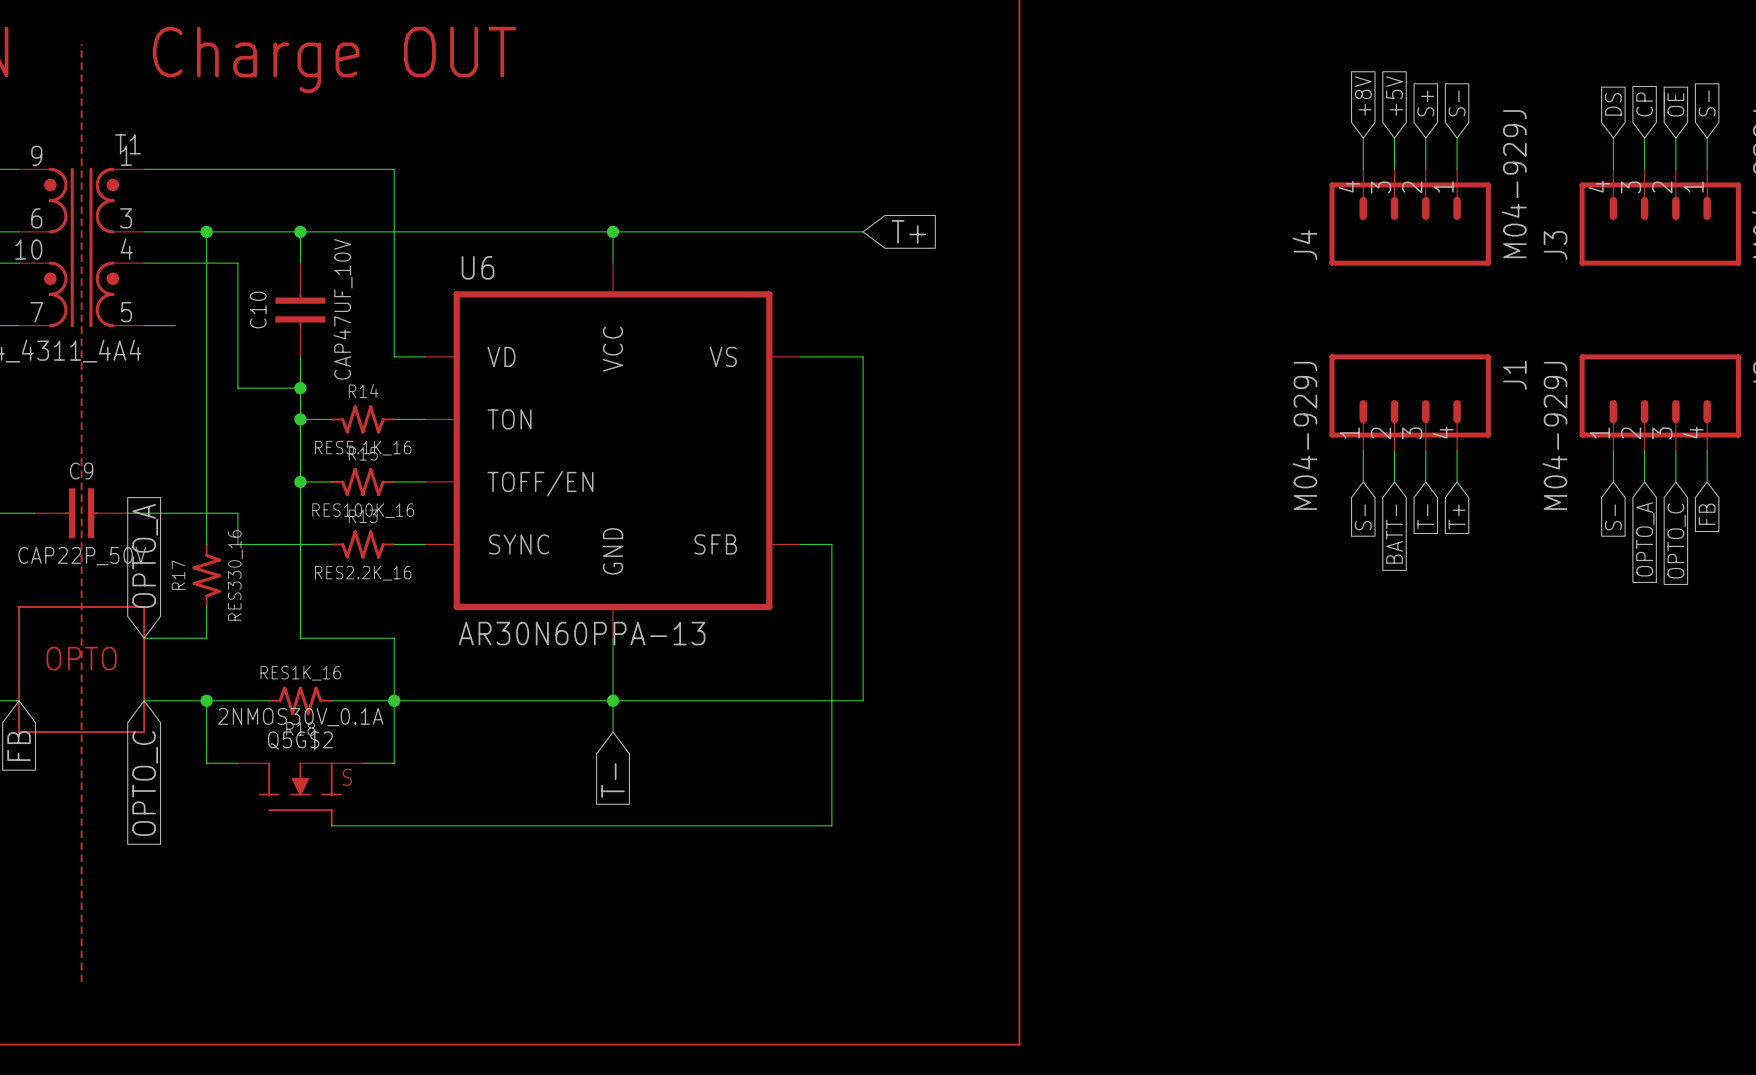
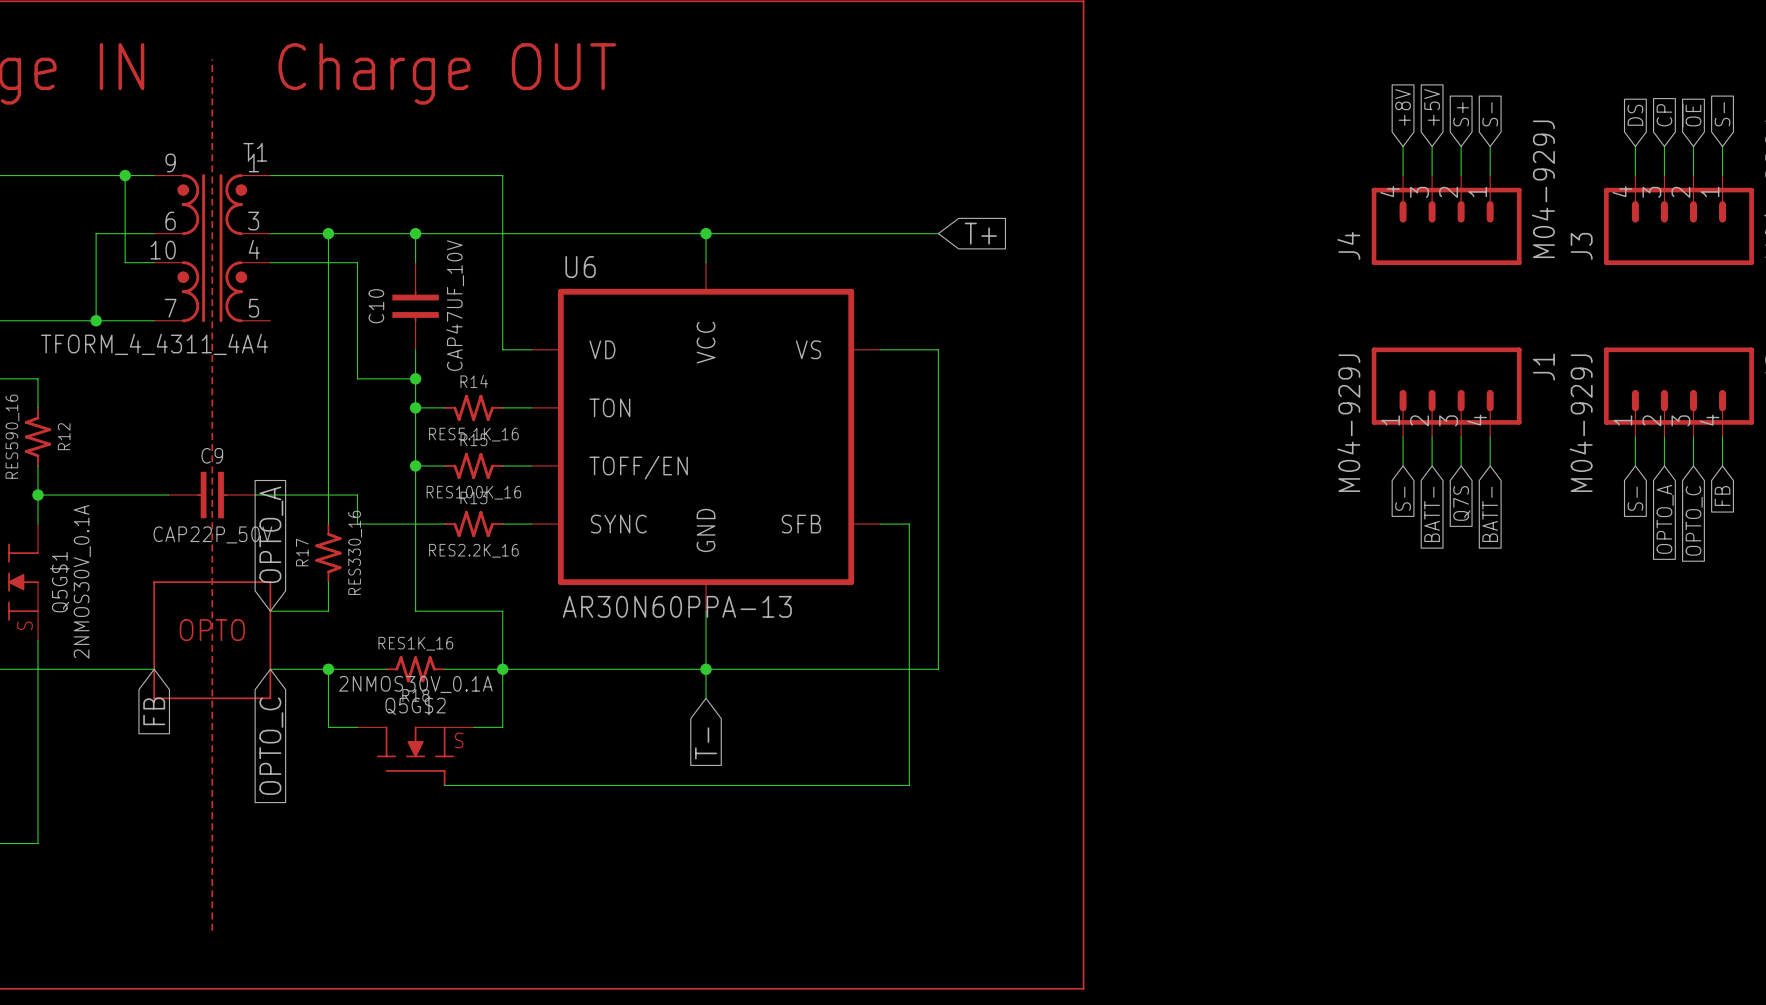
wire: (144, 325) (175, 325) -> none
global label: T- (1425, 516) -> Q7S (1461, 503)
global label: T+ (1457, 516) -> BATT- (1490, 514)

